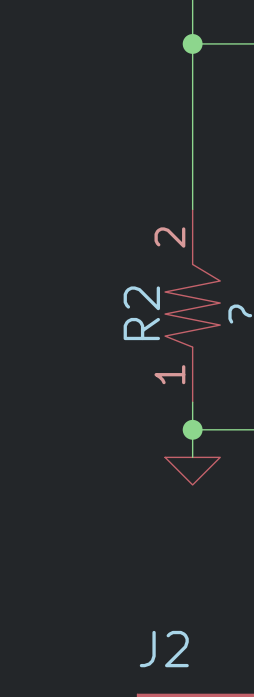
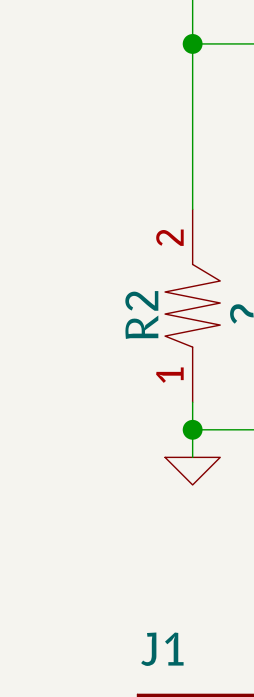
J2 name: J2 (164, 649) -> J1 (162, 649)

